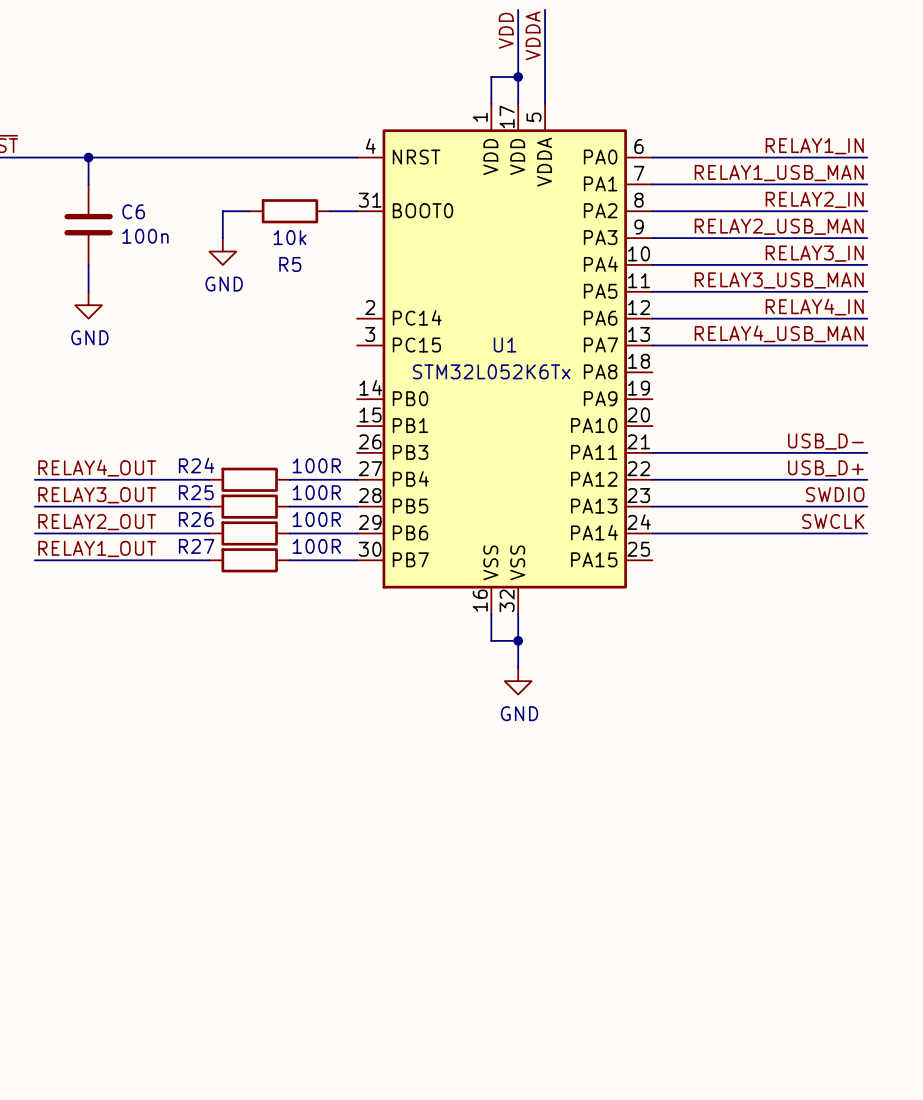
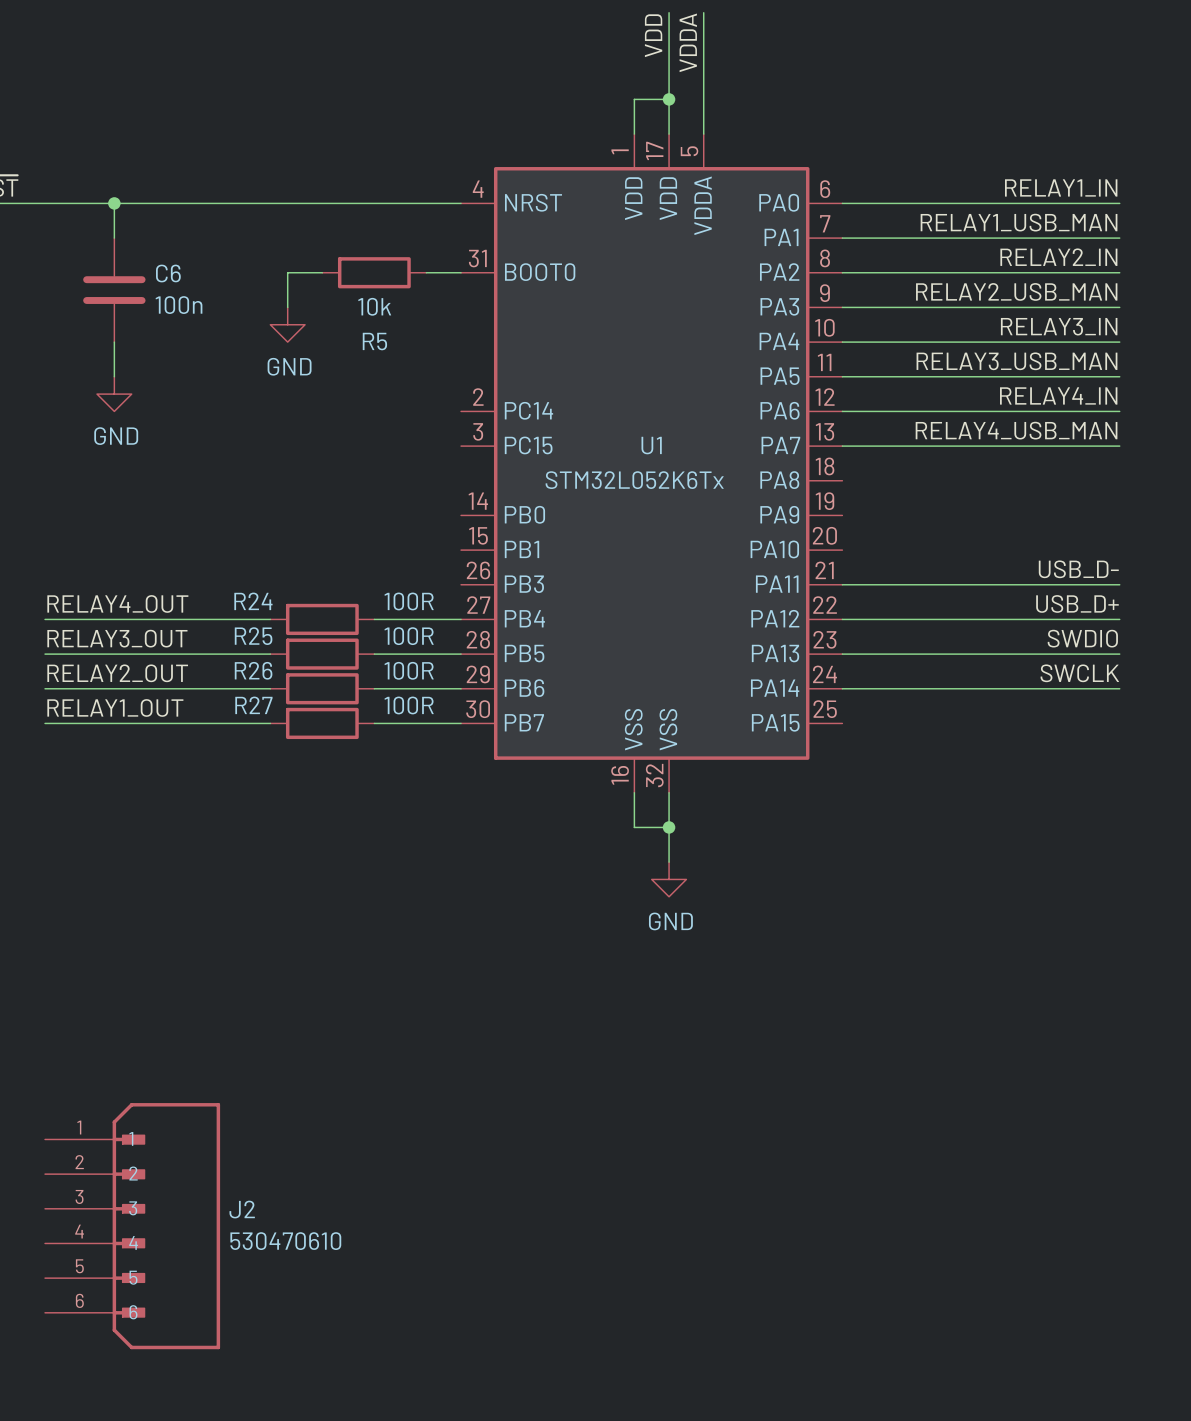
J2: none -> 530470610 (132, 1226)

